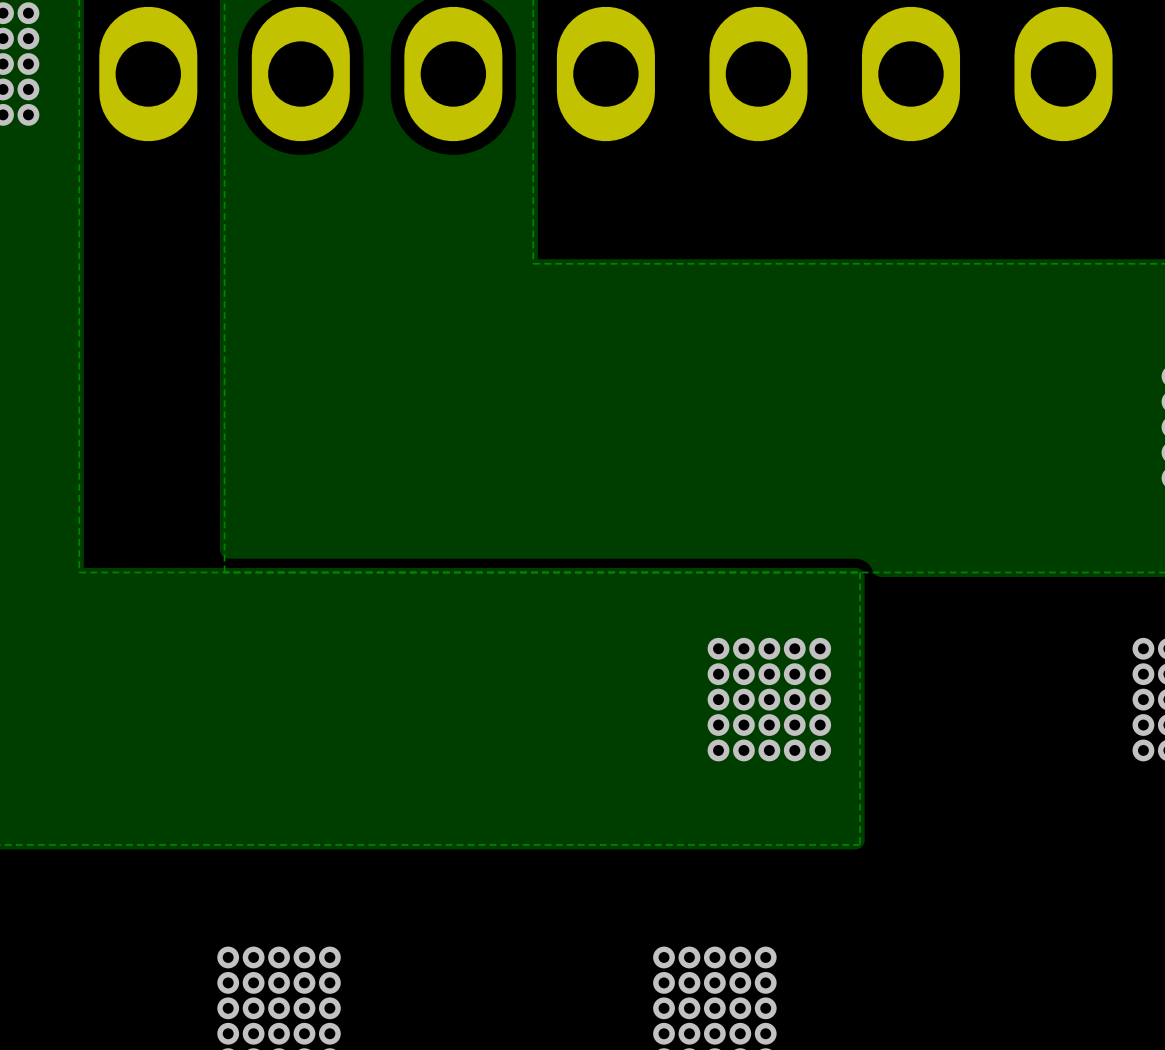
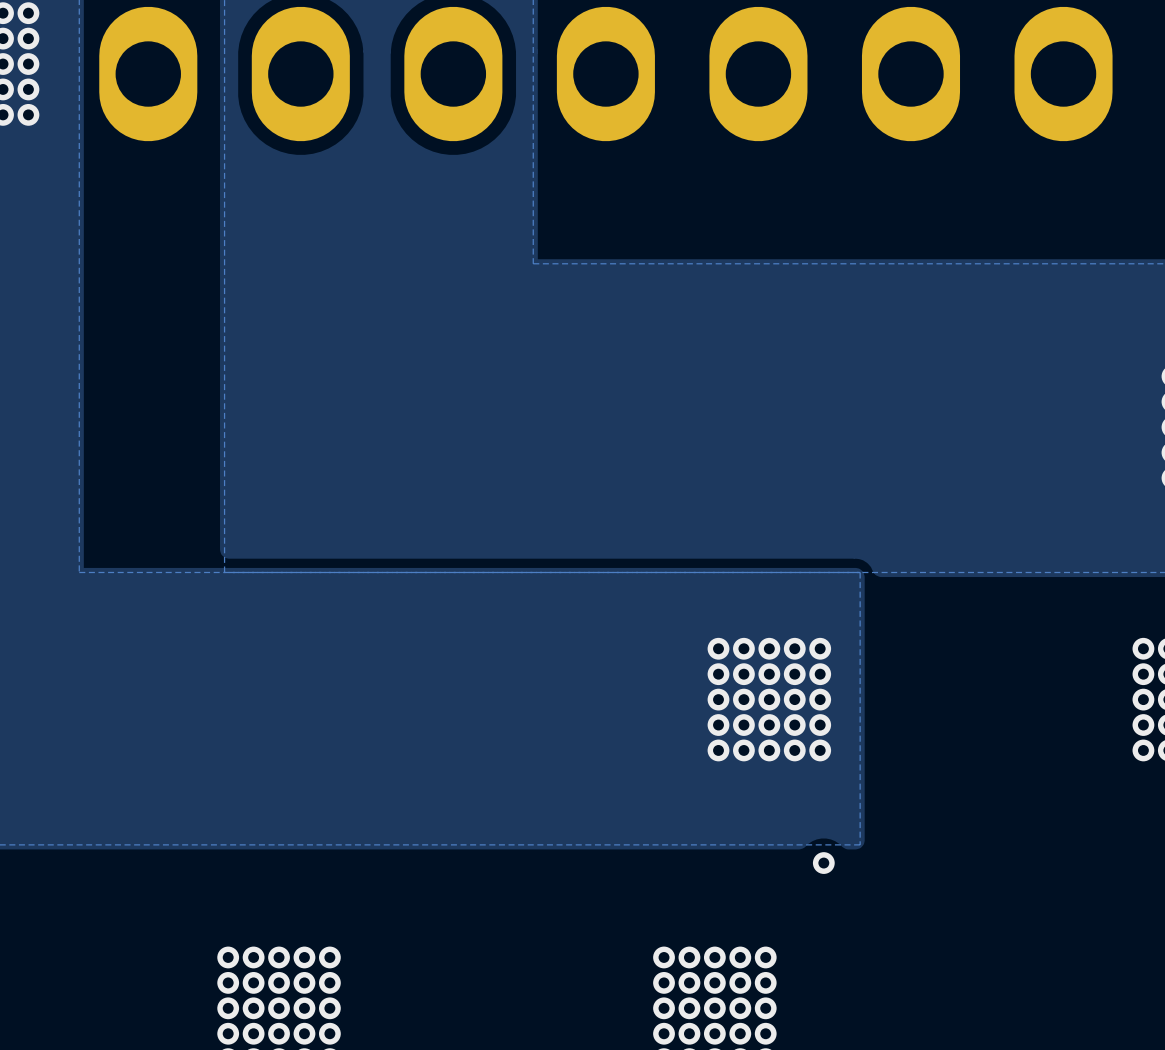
via: none -> (823, 863)

